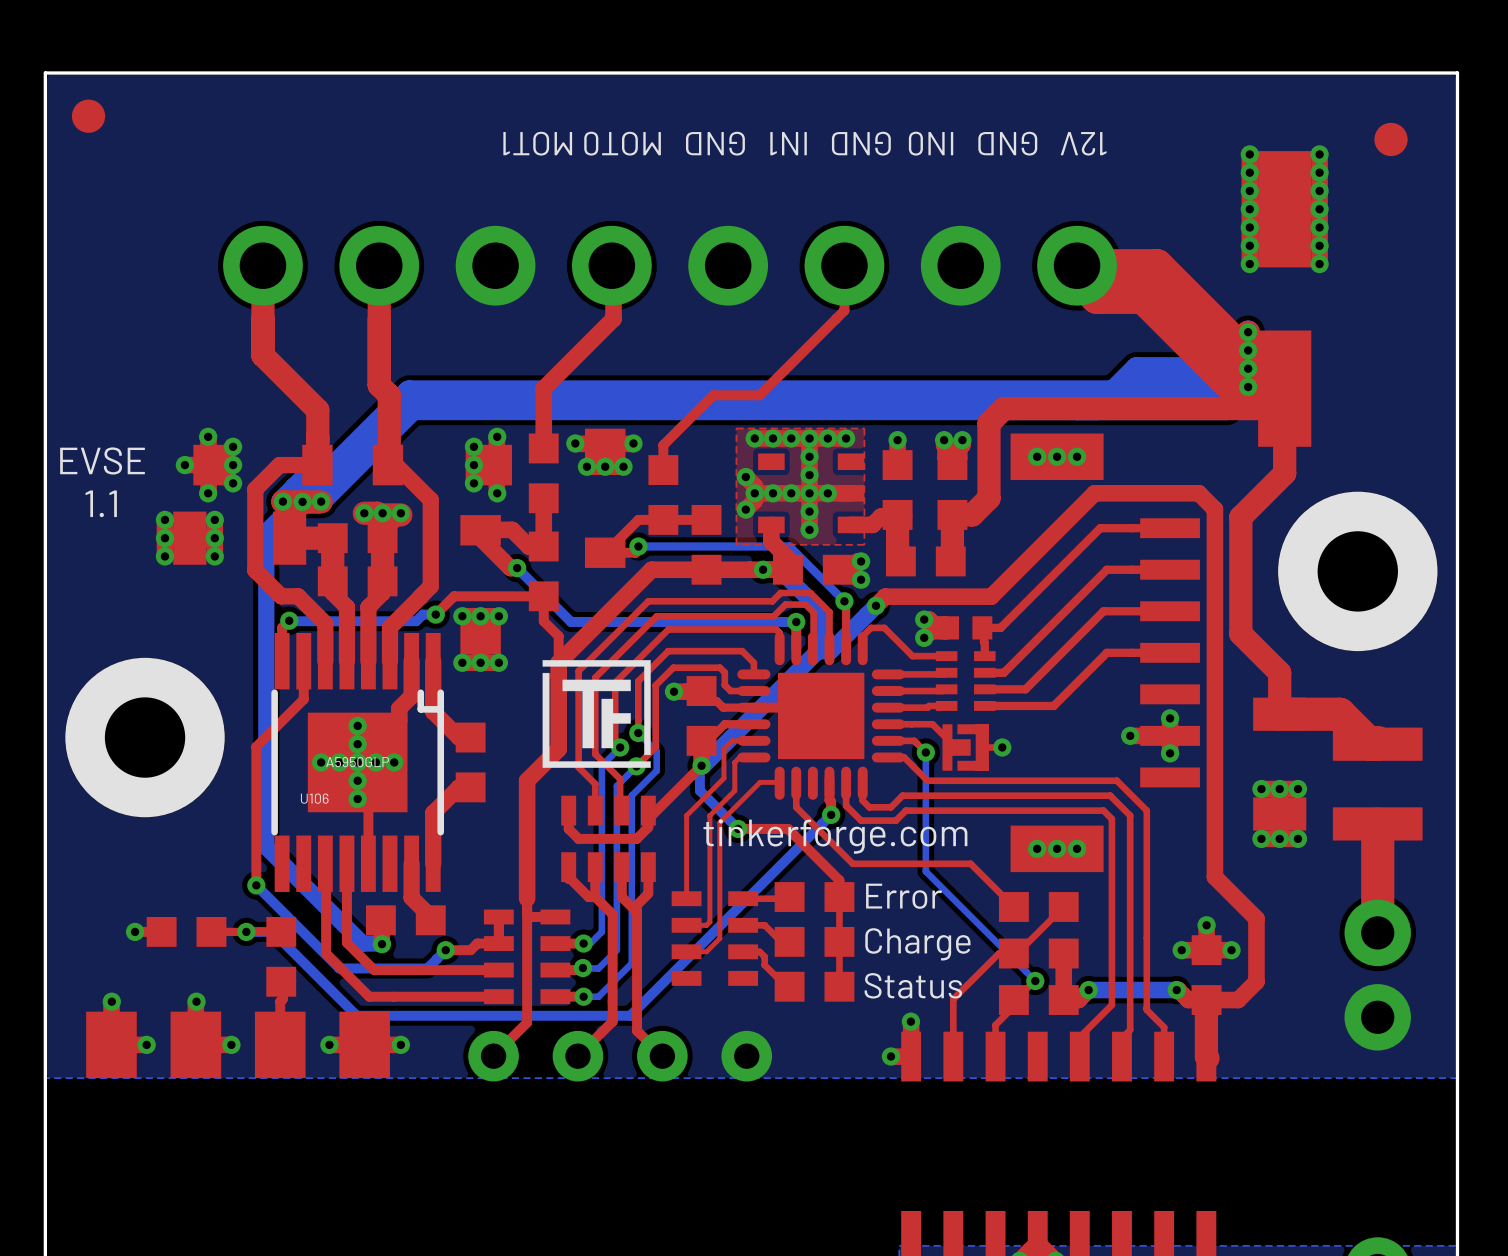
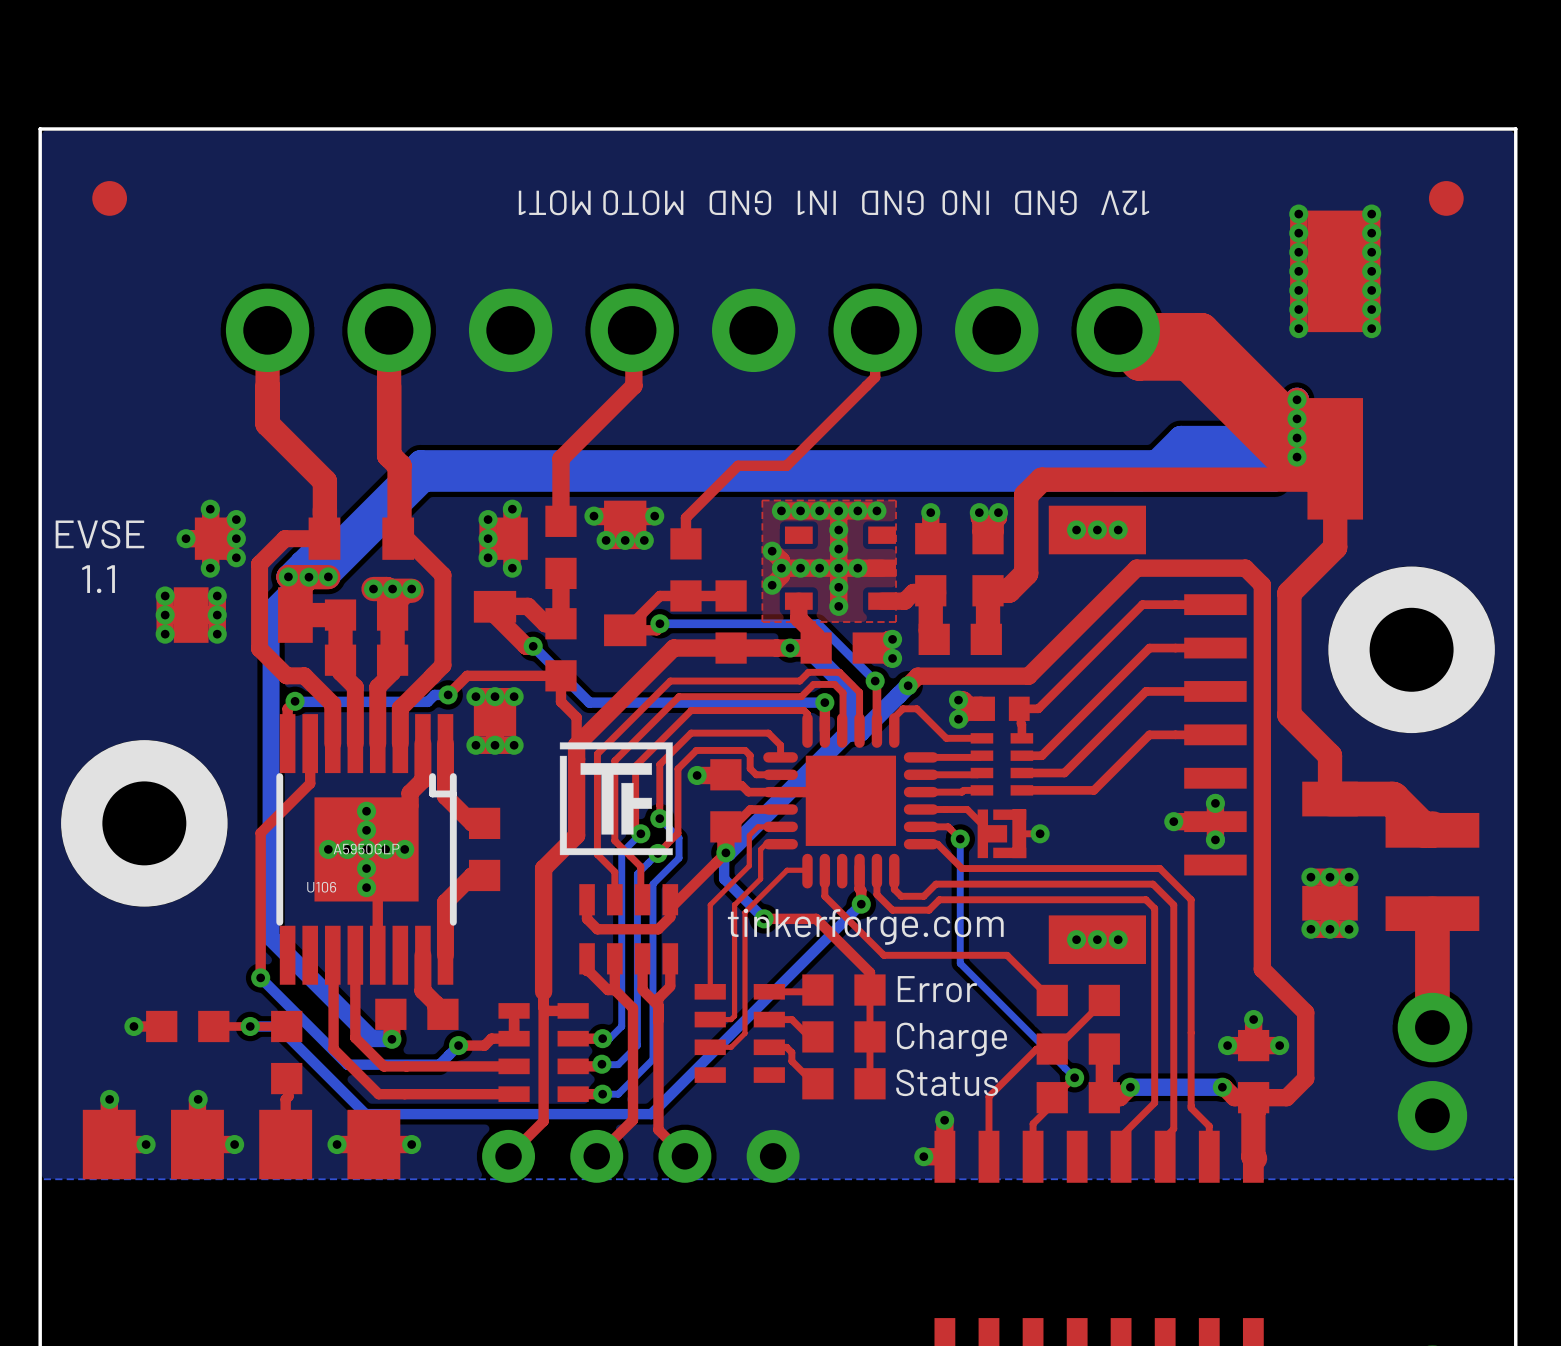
part position: (88, 116) -> (109, 198)

